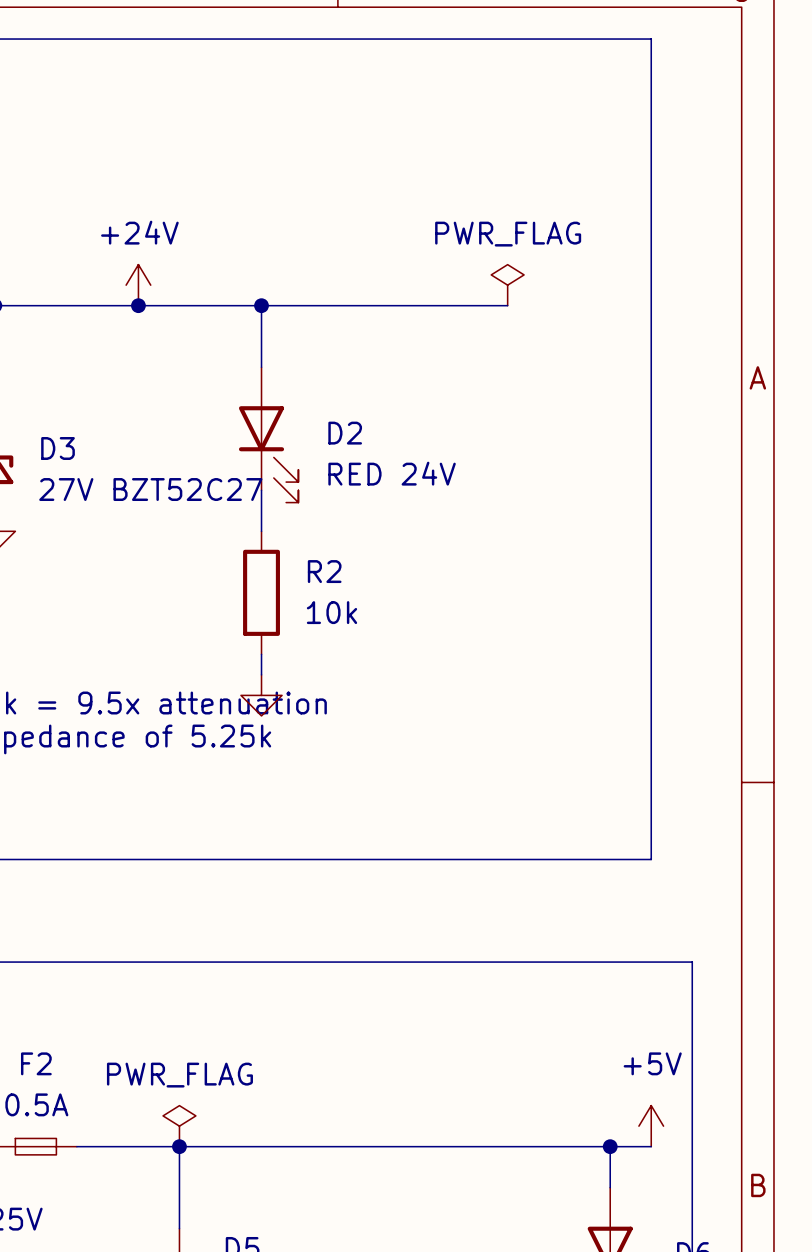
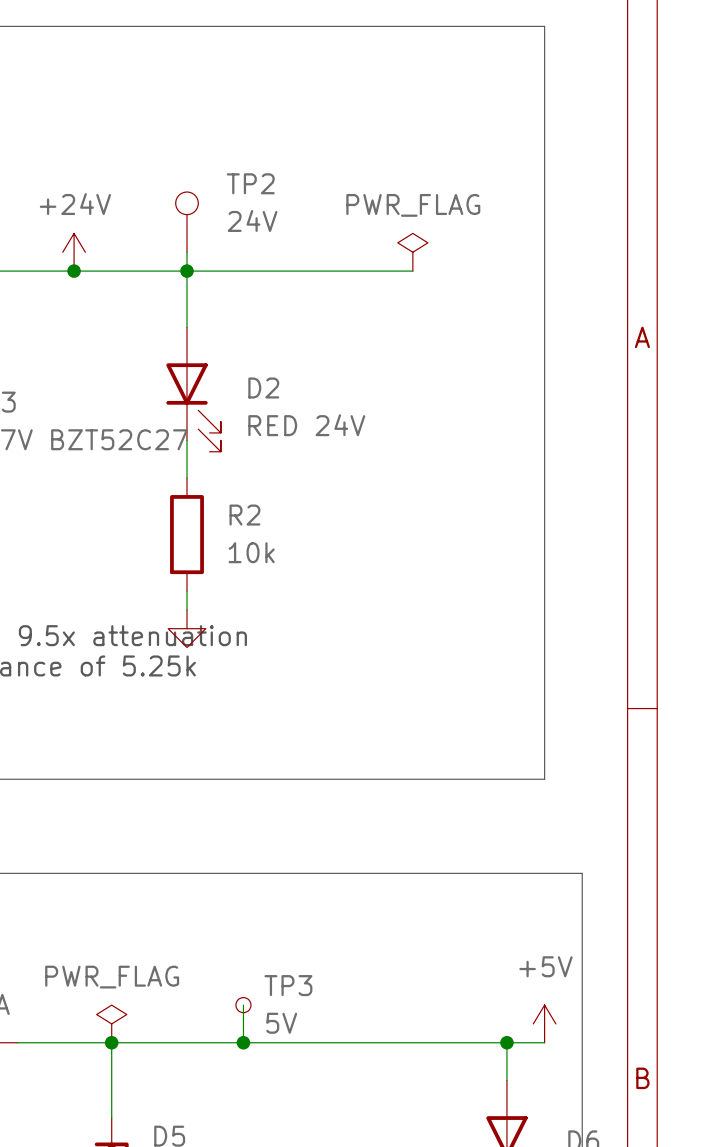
TP2: none -> 24V (186, 222)
wire: none -> (186, 252) (186, 271)
wire: none -> (243, 1005) (243, 1042)
TP3: none -> 5V (243, 1005)
junction: none -> (243, 1042)

